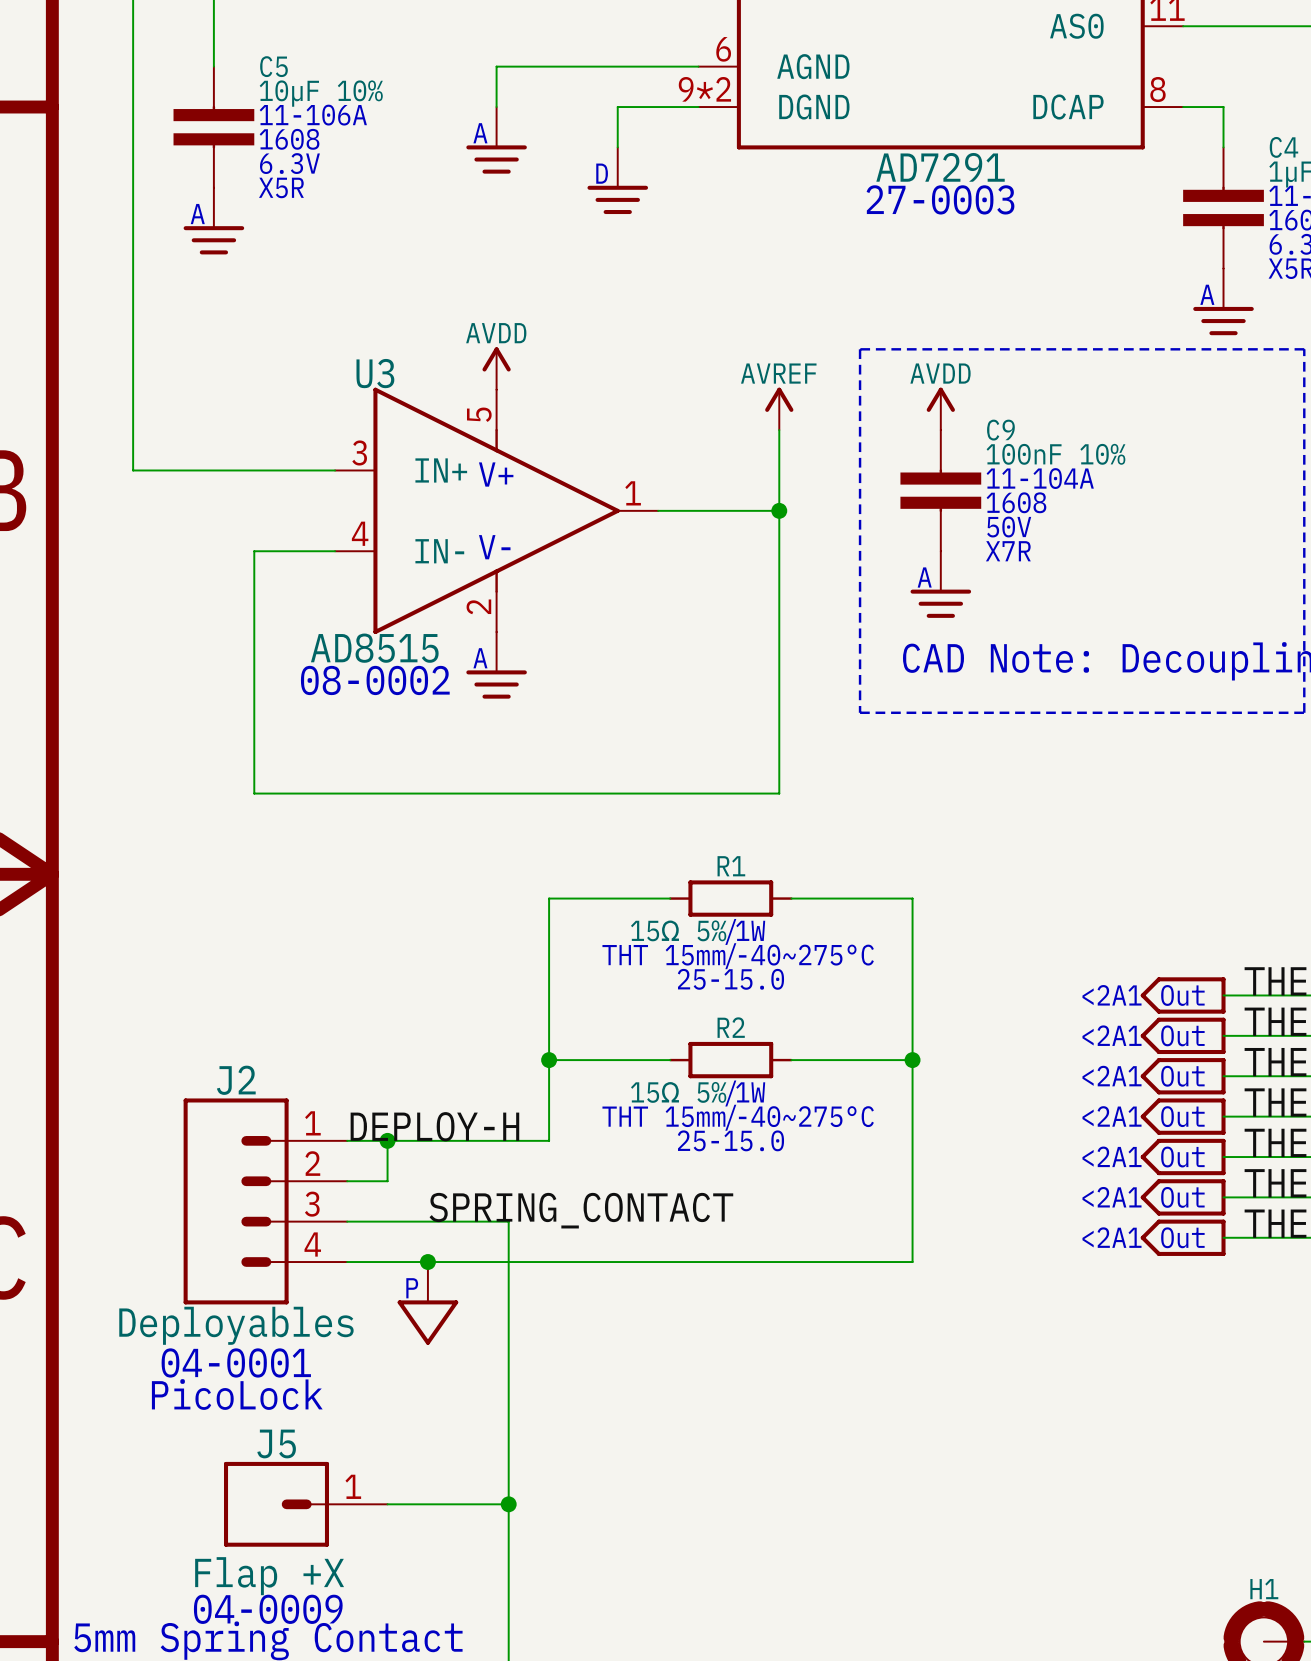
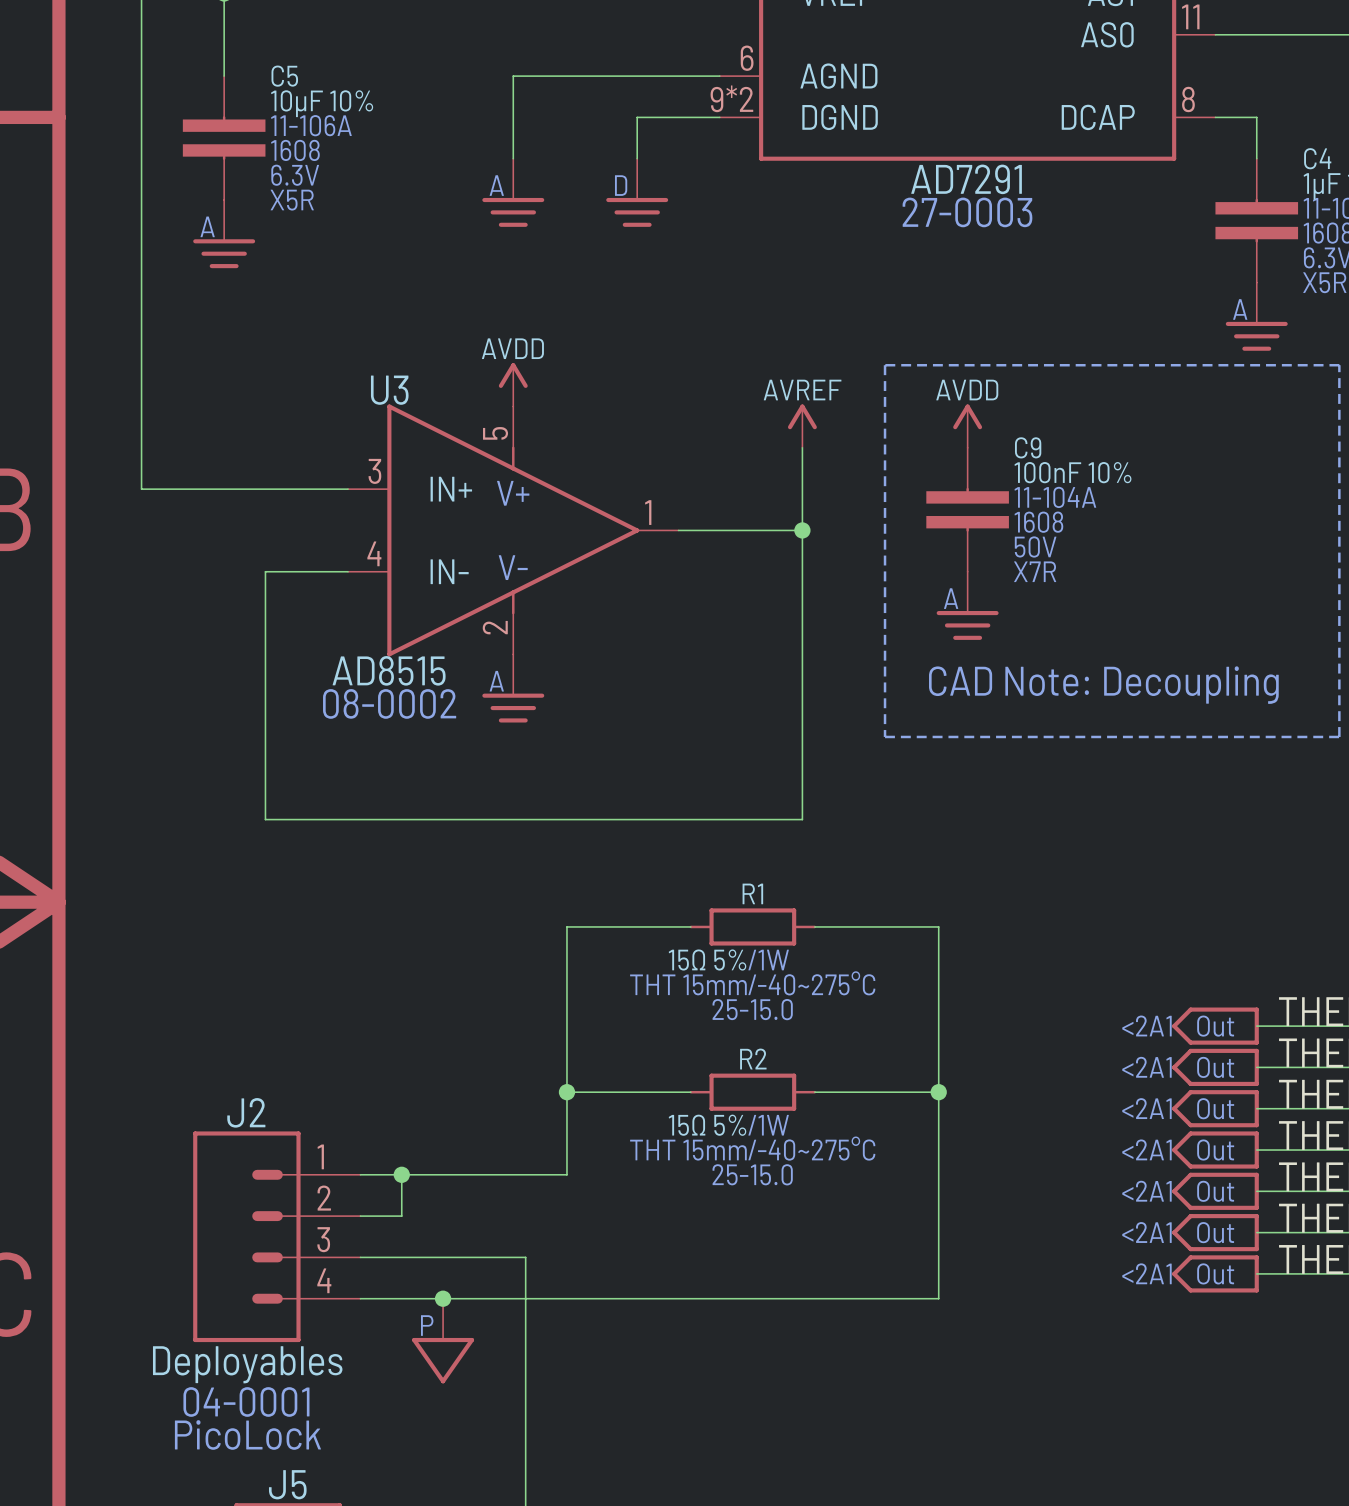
power symbol position: (496, 140) -> (513, 192)
label: DEPLOY-H (434, 1126) -> none
label: SPRING_CONTACT (581, 1210) -> none

